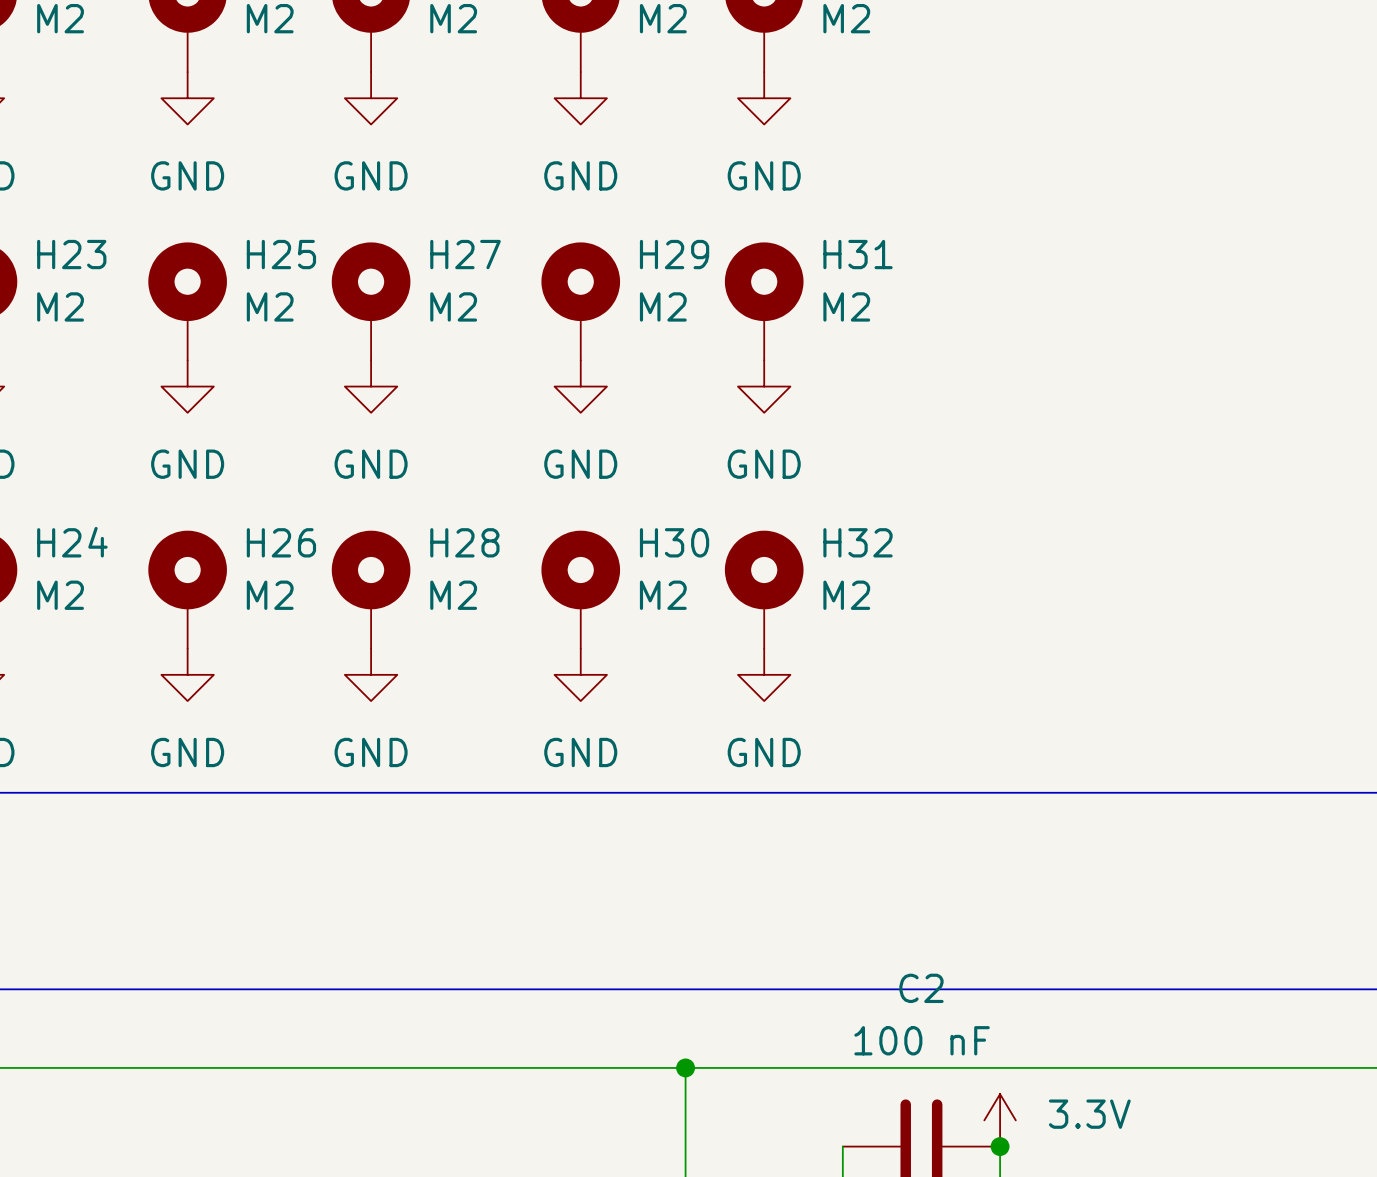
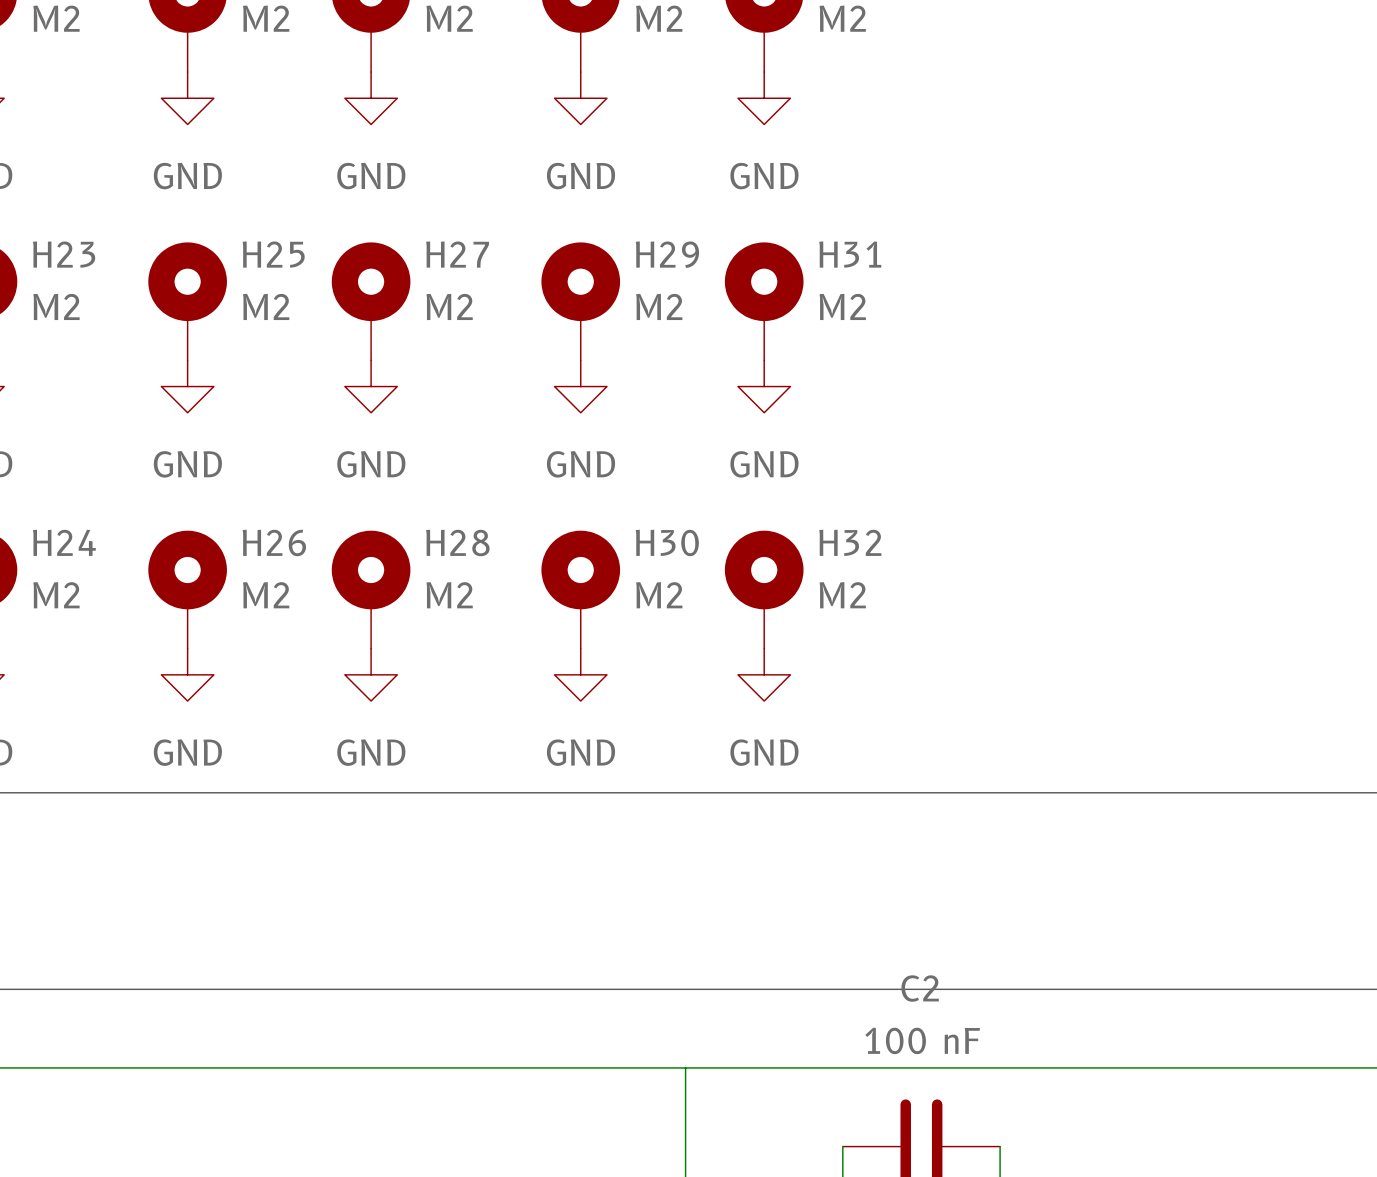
junction: (685, 1067) -> none
power symbol: 3.3V (1000, 1120) -> none
junction: (1000, 1146) -> none

